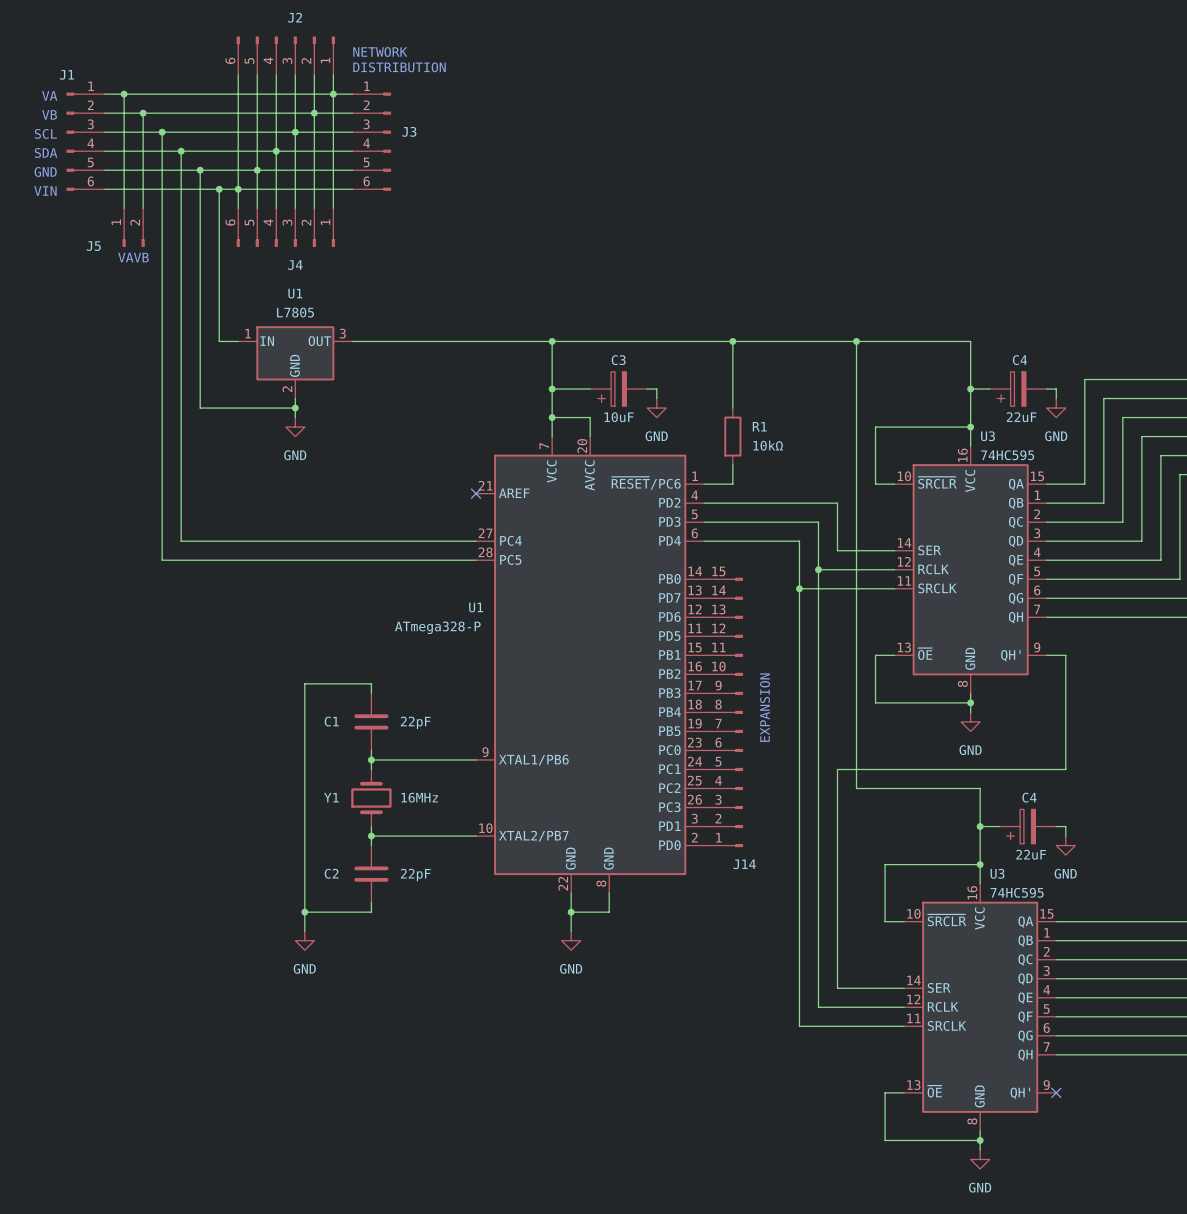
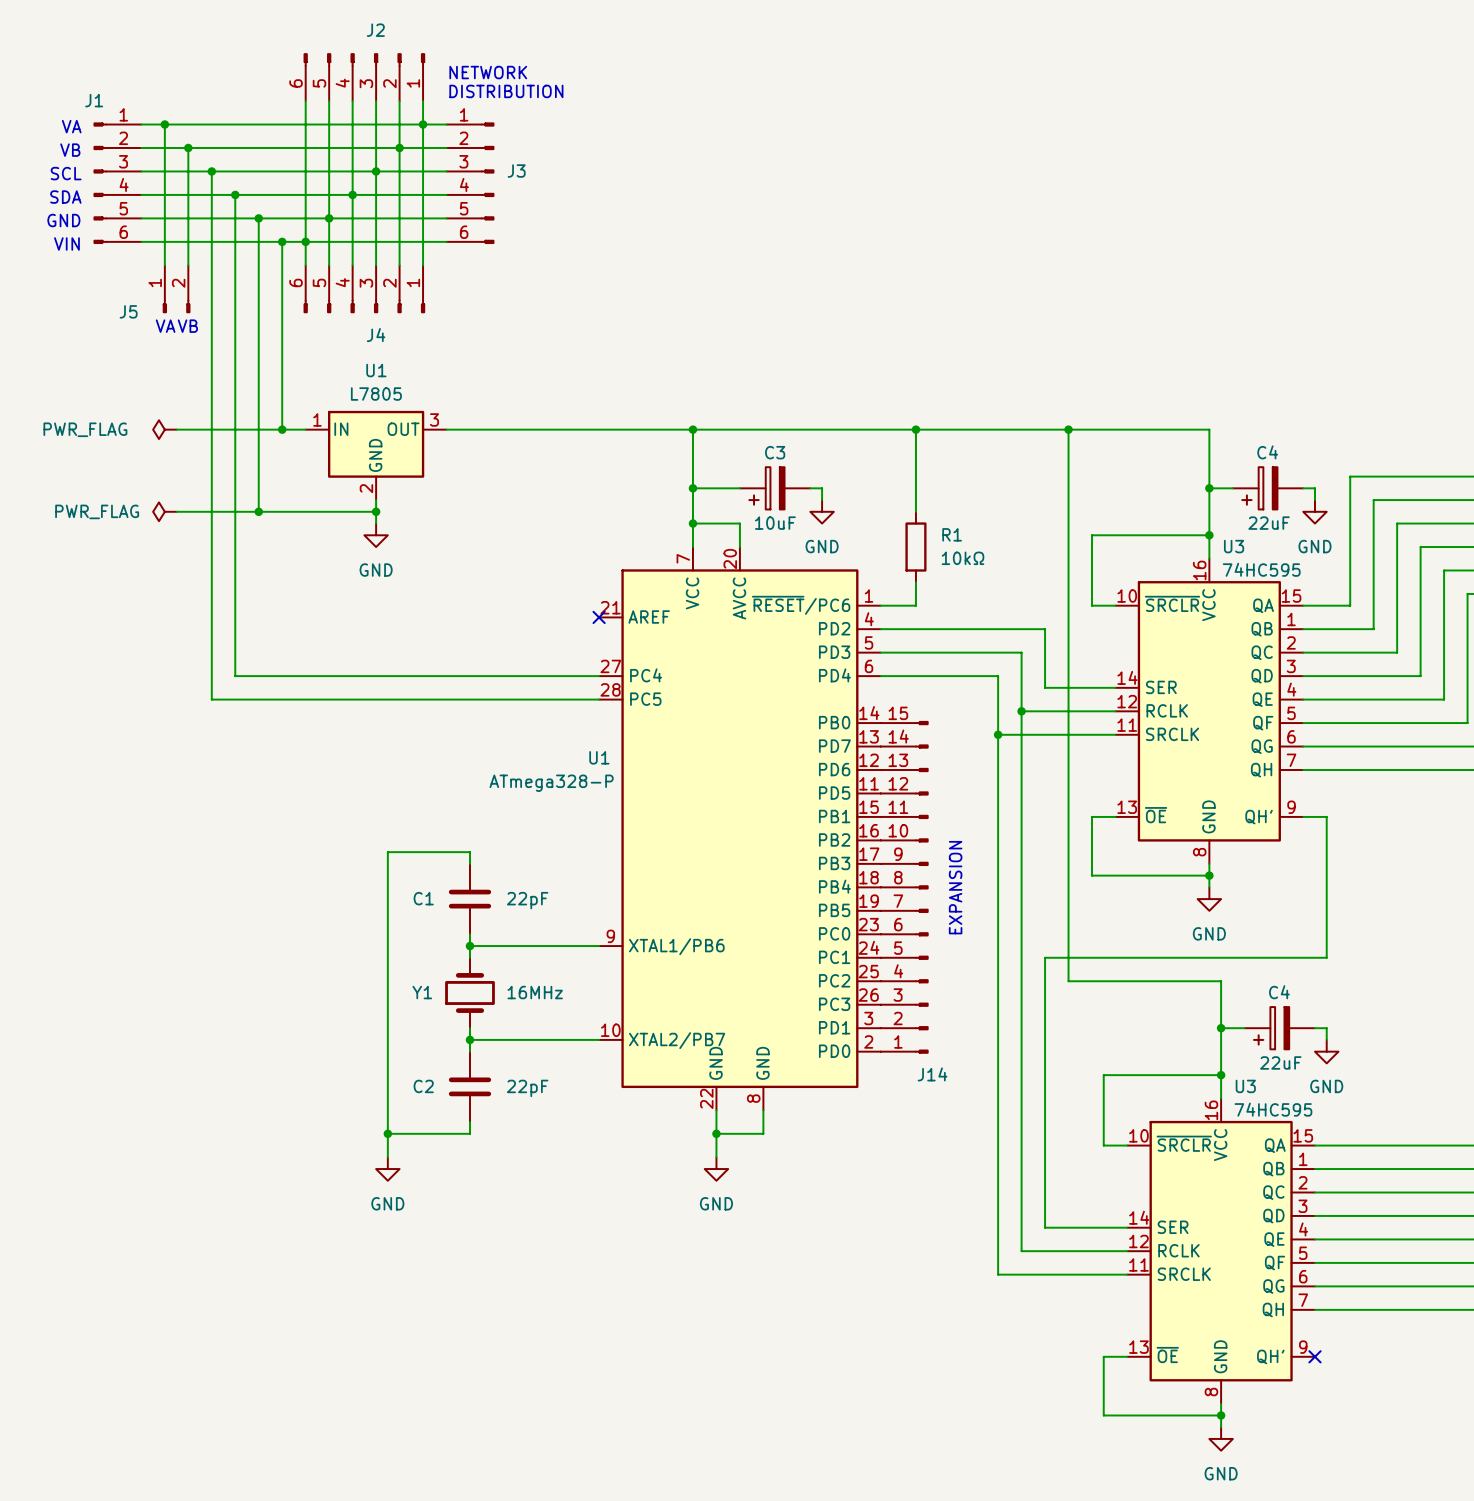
power symbol: none -> PWR_FLAG (164, 429)
wire: none -> (176, 429) (282, 429)
junction: none -> (282, 429)
power symbol: none -> PWR_FLAG (164, 511)
wire: none -> (176, 511) (258, 511)
junction: none -> (258, 511)

